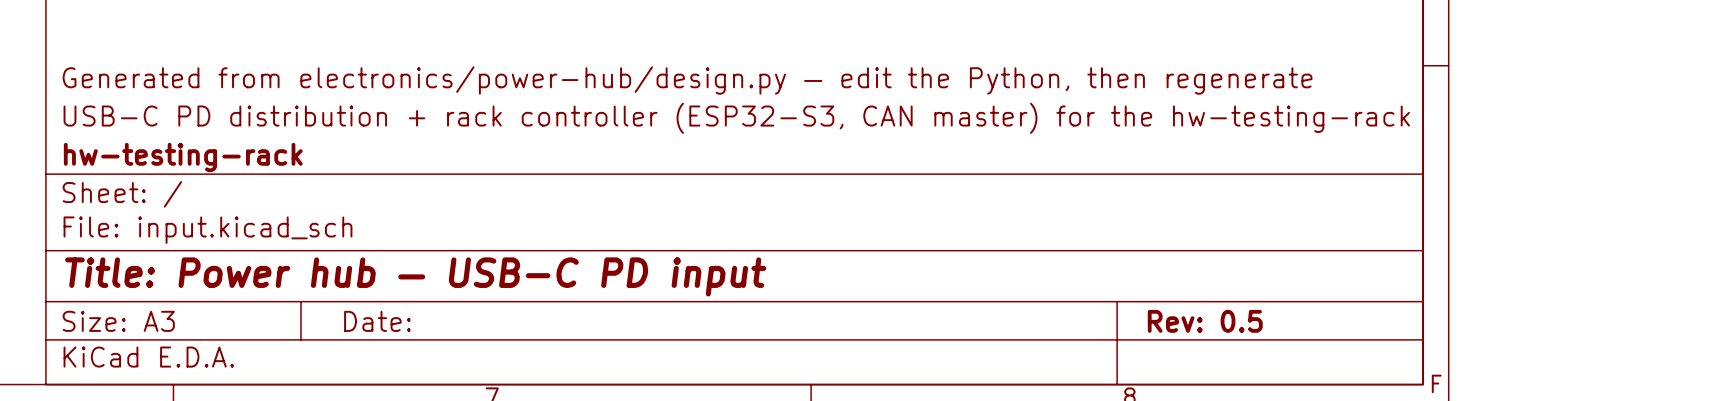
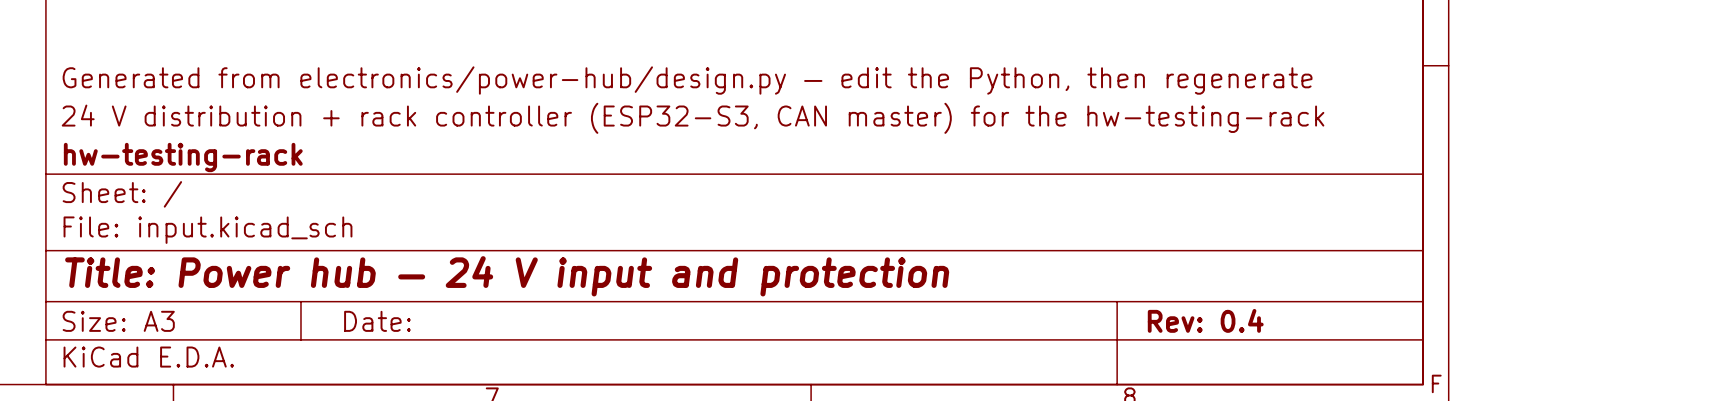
title block: USB-C PD distribution + rack controller (ESP32-S3, CAN master) for the hw-testing-rack (736, 118) -> 24 V distribution + rack controller (ESP32-S3, CAN master) for the hw-testing-rack (693, 118)
title block: Title: Power hub — USB-C PD input (415, 276) -> Title: Power hub — 24 V input and protection (507, 276)
title block: Rev: 0.5 (1205, 321) -> Rev: 0.4 (1205, 320)

